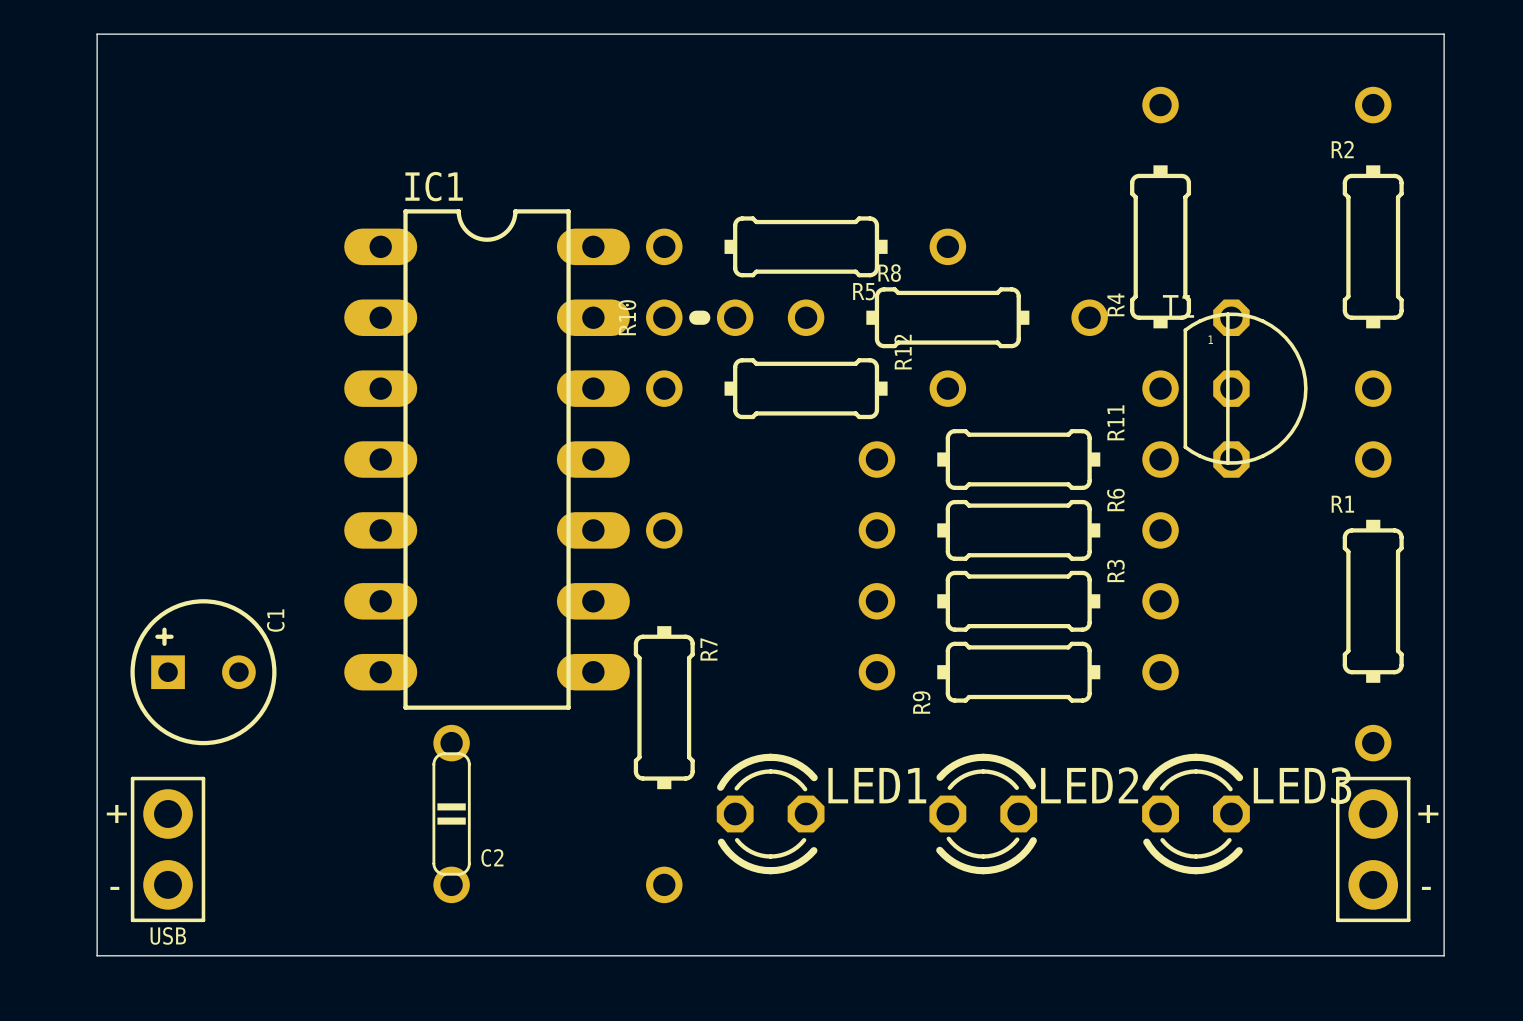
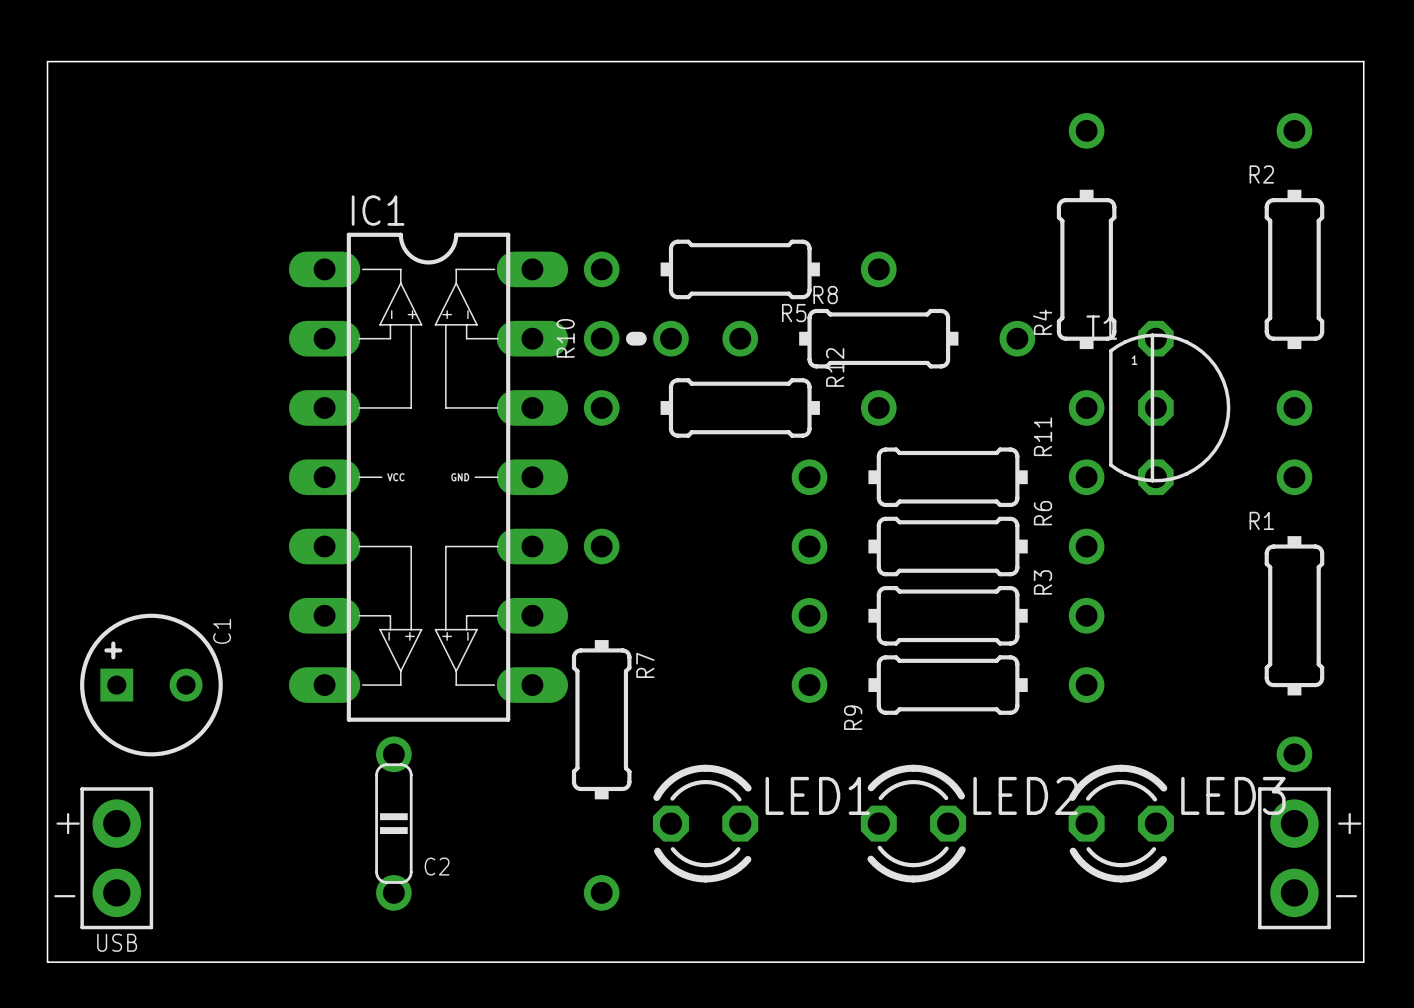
IC1 footprint: [344, 209, 630, 710] -> [288, 232, 569, 722]

